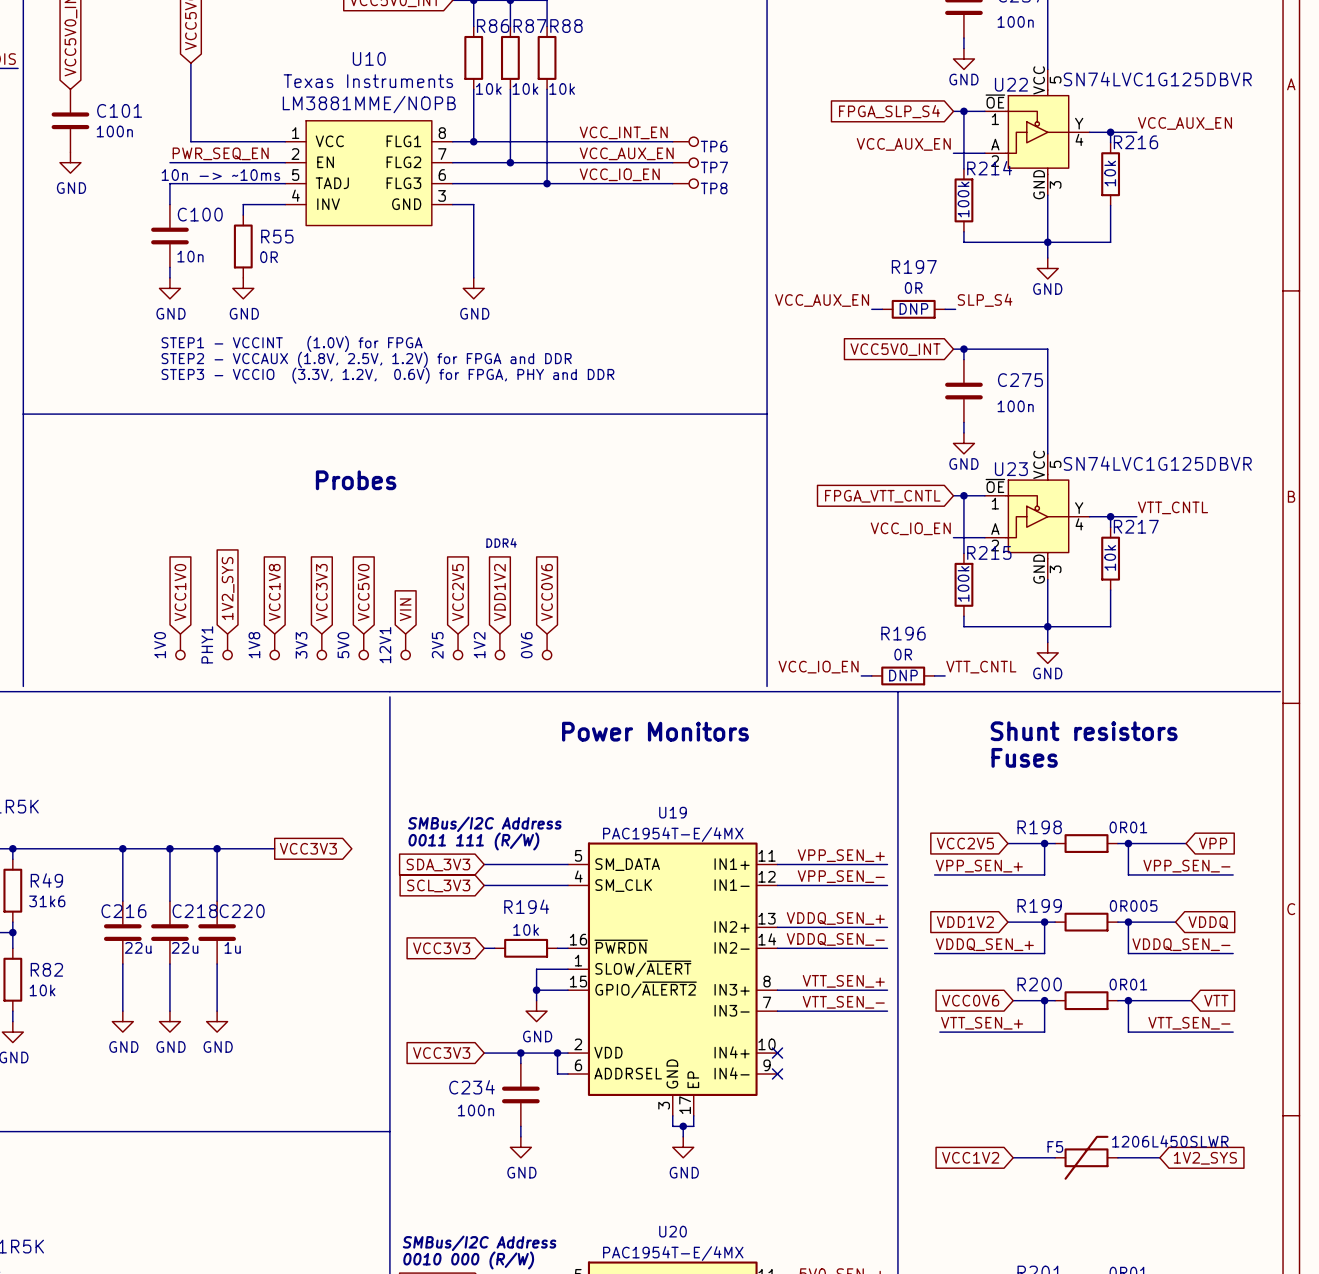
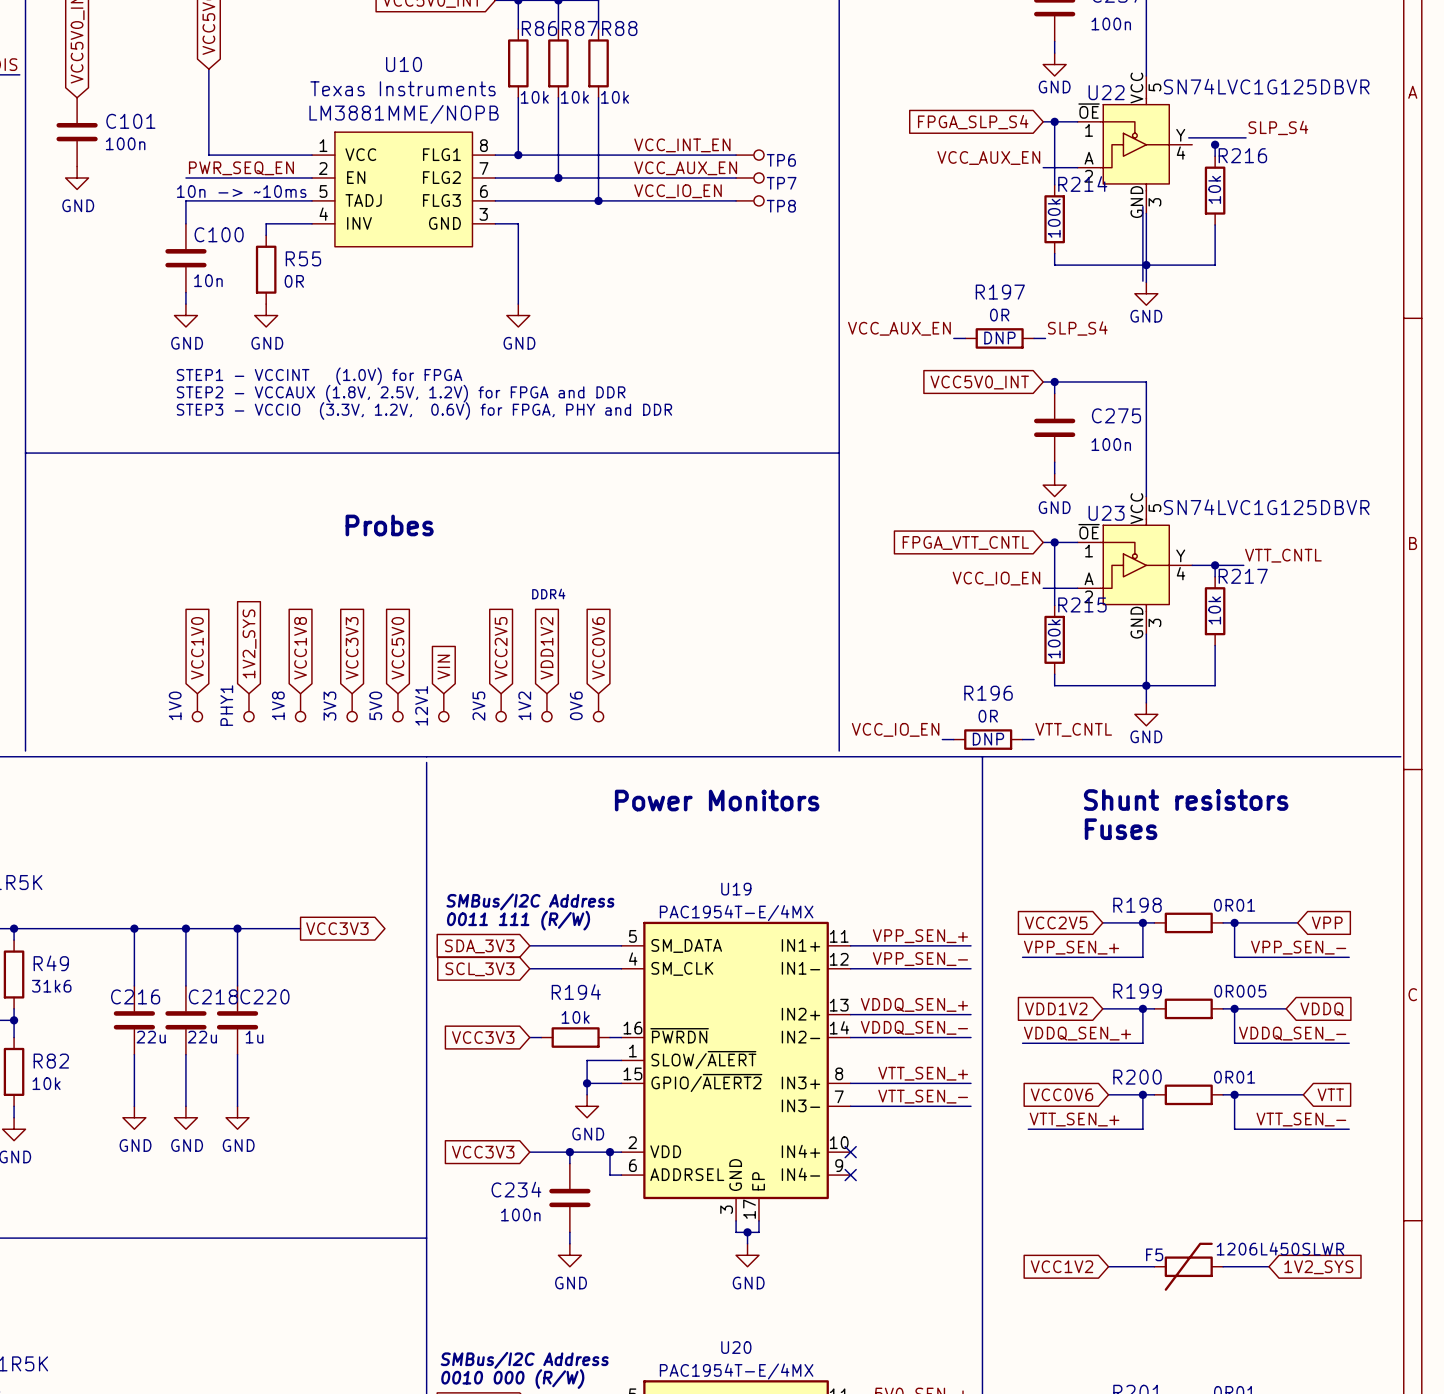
label: VCC_AUX_EN (1185, 123) -> SLP_S4 (1278, 127)
wire: none -> (1188, 137) (1246, 137)
wire: (1089, 132) (1136, 132) -> none
wire: none -> (1142, 206) (1142, 281)

